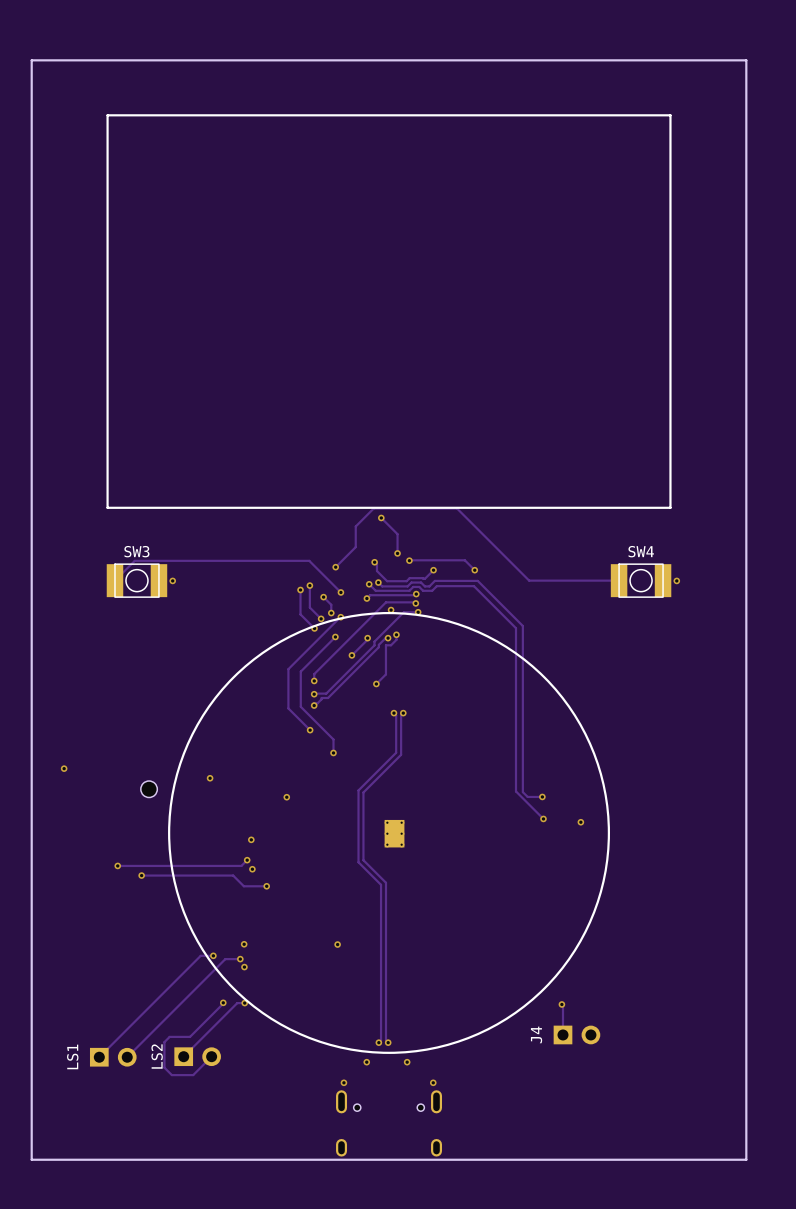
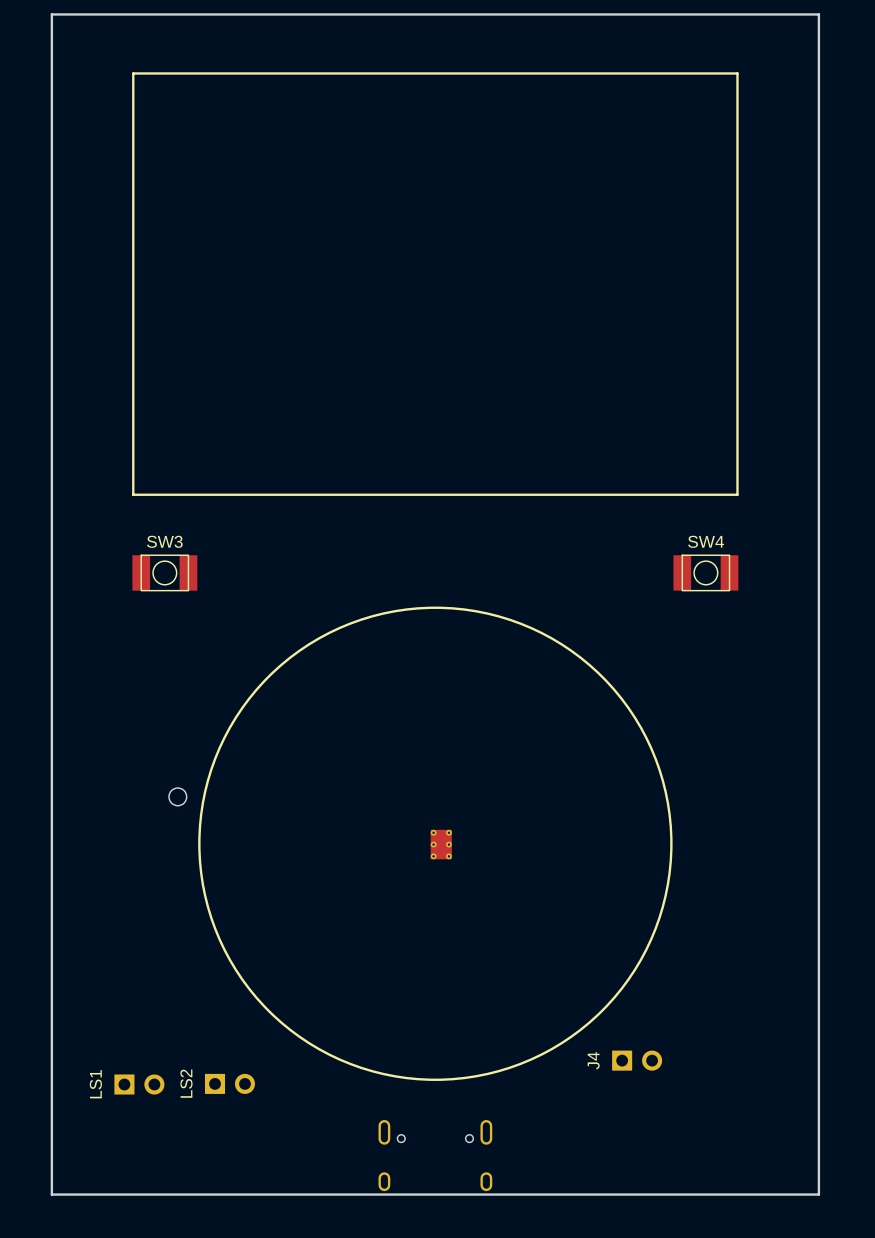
track: (381, 517) (397, 534) (397, 553) -> none
via: (381, 517) -> none
via: (397, 553) -> none
track: (409, 560) (464, 560) (474, 570) -> none
via: (409, 560) -> none
track: (374, 562) (376, 563) (376, 571) (387, 581) (406, 581) (409, 578) (424, 578) (433, 570) -> none
via: (374, 562) -> none
track: (335, 567) (355, 547) (355, 526) (373, 508) (457, 508) (529, 580) (619, 580) -> none
via: (335, 567) -> none
via: (433, 570) -> none
via: (474, 570) -> none
track: (114, 580) (134, 560) (309, 560) (340, 592) -> none
via: (172, 580) -> none
via: (676, 580) -> none
track: (378, 582) (382, 586) (407, 586) (411, 582) (421, 582) (424, 586) (429, 586) (434, 580) (477, 580) (522, 625) (522, 792) (527, 796) (542, 796) -> none
via: (378, 582) -> none
track: (369, 584) (375, 590) (409, 590) (413, 586) (419, 586) (423, 590) (432, 590) (436, 586) (473, 586) (516, 628) (516, 791) (543, 818) -> none
via: (369, 584) -> none
track: (309, 585) (309, 607) (321, 618) -> none
via: (309, 585) -> none
track: (300, 589) (300, 614) (314, 628) -> none
via: (300, 589) -> none
via: (340, 592) -> none
track: (416, 594) (370, 595) (366, 598) -> none
via: (416, 594) -> none
track: (323, 597) (331, 604) (331, 613) -> none
via: (323, 597) -> none
via: (366, 598) -> none
track: (415, 603) (385, 602) (314, 674) (314, 680) -> none
via: (415, 603) -> none
via: (391, 610) -> none
track: (418, 612) (403, 612) (374, 641) (374, 645) (326, 693) (314, 694) -> none
via: (418, 612) -> none
via: (331, 613) -> none
track: (340, 617) (288, 669) (288, 708) (310, 730) -> none
via: (340, 617) -> none
via: (321, 618) -> none
via: (314, 628) -> none
track: (396, 634) (396, 639) (391, 645) (385, 645) (385, 674) (376, 683) -> none
via: (396, 634) -> none
track: (335, 636) (300, 671) (300, 706) (333, 739) (333, 752) -> none
via: (335, 636) -> none
track: (367, 638) (351, 655) -> none
via: (367, 638) -> none
track: (388, 638) (385, 638) (328, 698) (321, 698) (317, 703) (314, 703) (314, 705) -> none
via: (388, 638) -> none
via: (351, 655) -> none
via: (314, 680) -> none
via: (376, 683) -> none
via: (314, 694) -> none
via: (314, 705) -> none
track: (393, 713) (396, 715) (396, 752) (358, 790) (358, 862) (381, 884) (381, 1040) (378, 1042) -> none
via: (393, 713) -> none
track: (403, 713) (401, 715) (401, 754) (363, 792) (363, 860) (385, 882) (385, 1040) (388, 1042) -> none
via: (403, 713) -> none
via: (310, 730) -> none
via: (333, 752) -> none
via: (64, 768) -> none
via: (210, 778) -> none
via: (542, 796) -> none
via: (286, 797) -> none
via: (543, 818) -> none
via: (580, 822) -> none
via: (251, 839) -> none
track: (247, 860) (241, 865) (117, 865) -> none
via: (247, 860) -> none
via: (117, 865) -> none
via: (252, 869) -> none
track: (141, 875) (233, 875) (243, 886) (266, 886) -> none
via: (141, 875) -> none
via: (266, 886) -> none
via: (244, 944) -> none
via: (337, 944) -> none
track: (213, 955) (200, 955) (99, 1057) -> none
via: (213, 955) -> none
track: (240, 959) (225, 959) (127, 1057) -> none
via: (240, 959) -> none
via: (244, 967) -> none
track: (223, 1002) (190, 1036) (169, 1036) (164, 1042) (164, 1067) (171, 1075) (193, 1075) (211, 1056) -> none
via: (223, 1002) -> none
track: (244, 1003) (237, 1003) (183, 1056) -> none
via: (244, 1003) -> none
track: (561, 1004) (563, 1034) -> none
via: (561, 1004) -> none
via: (378, 1042) -> none
via: (388, 1042) -> none
via: (366, 1062) -> none
via: (407, 1062) -> none
via: (343, 1082) -> none
via: (433, 1082) -> none

